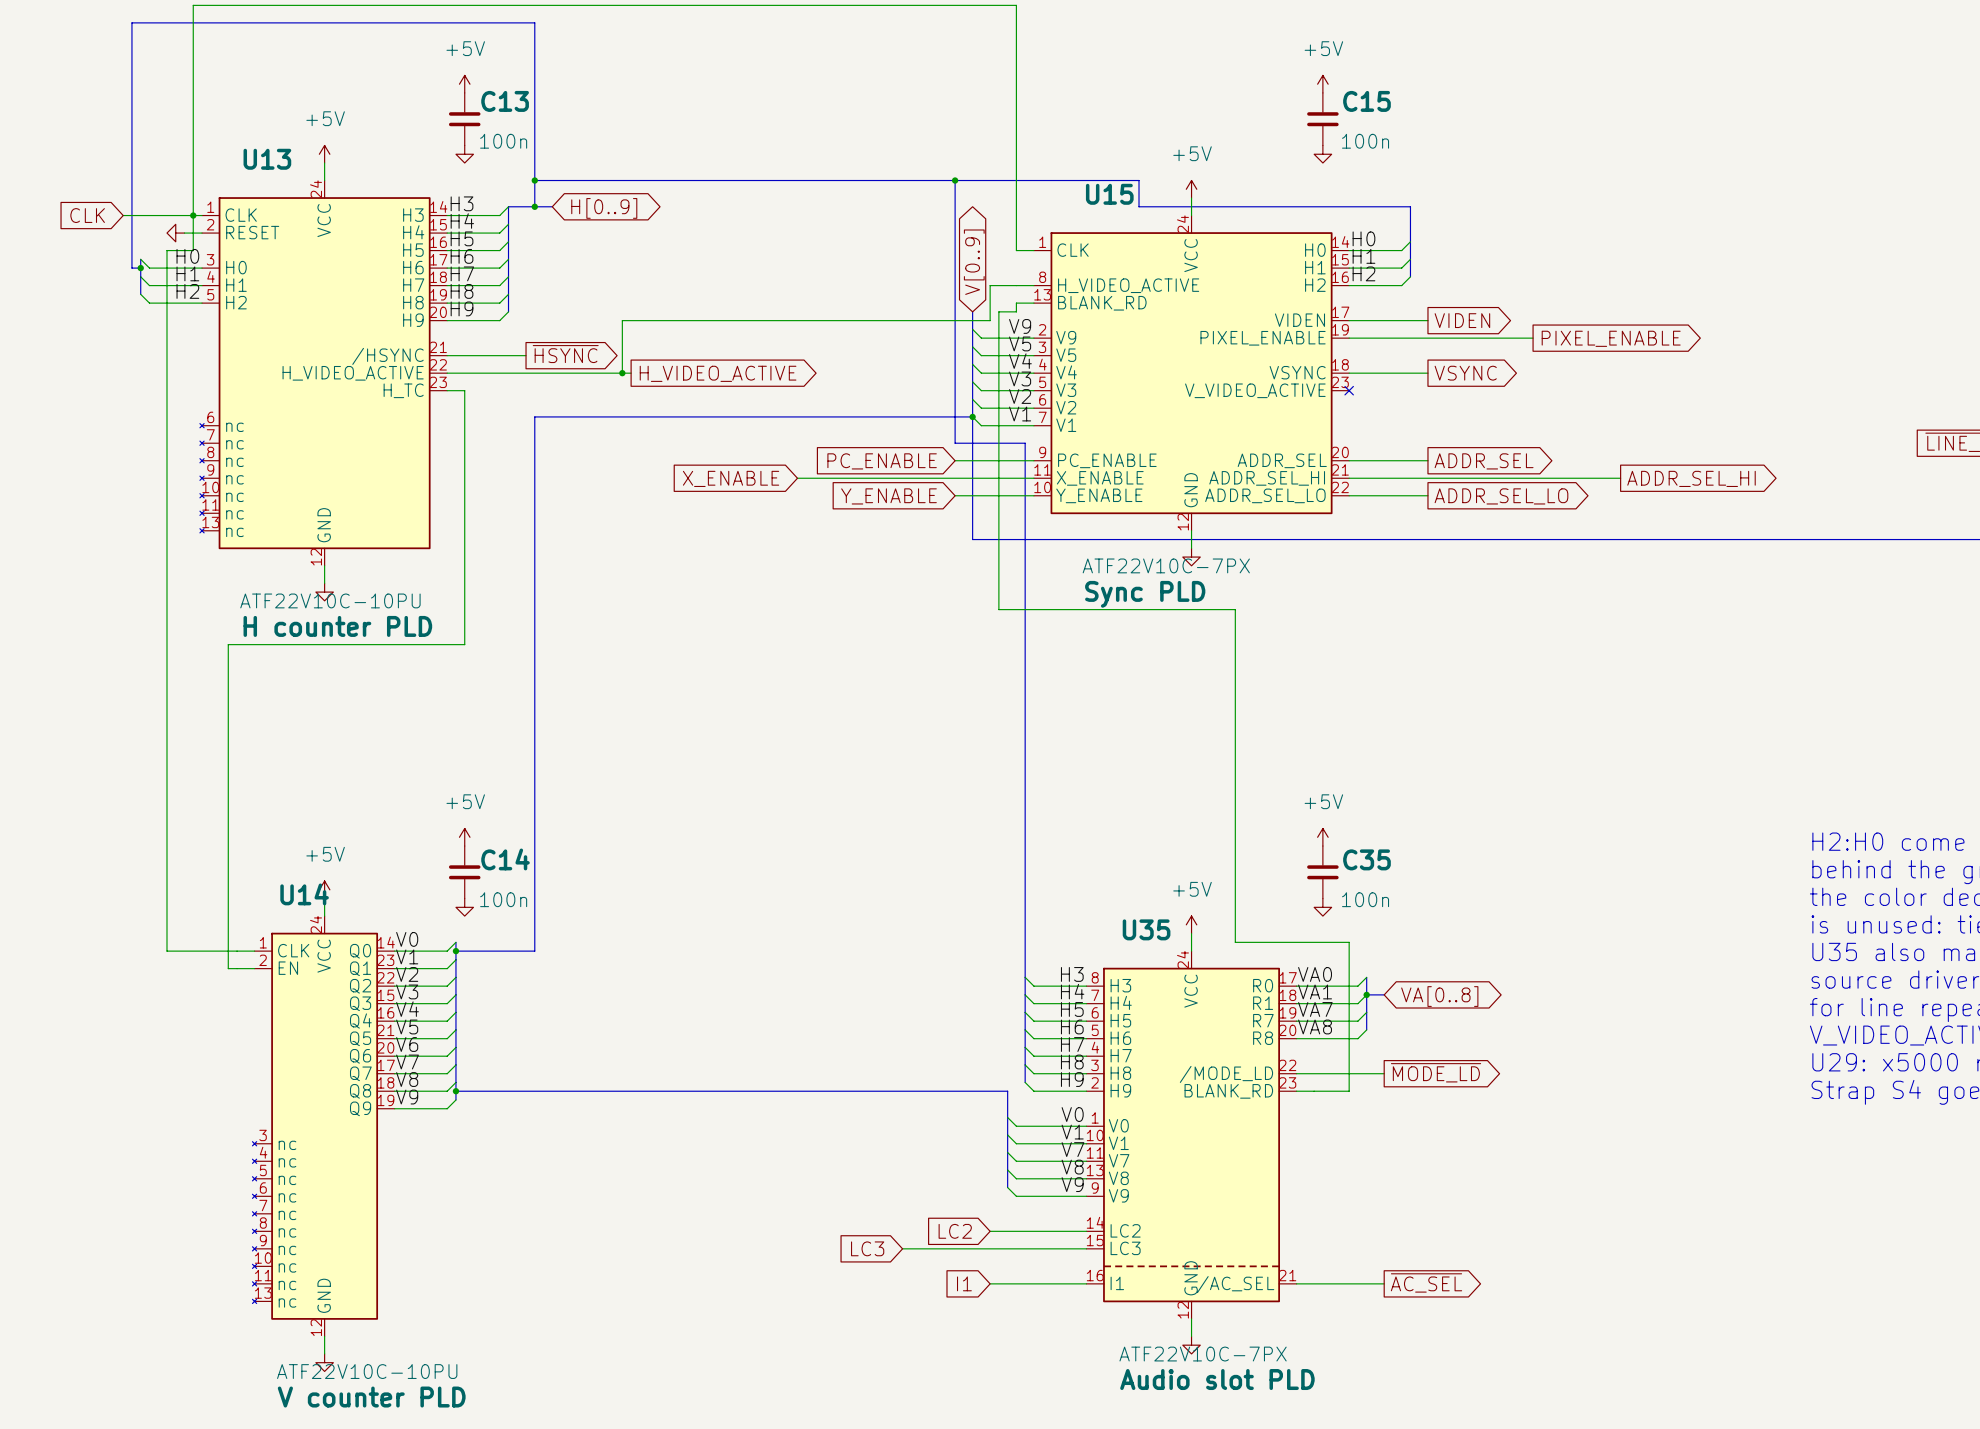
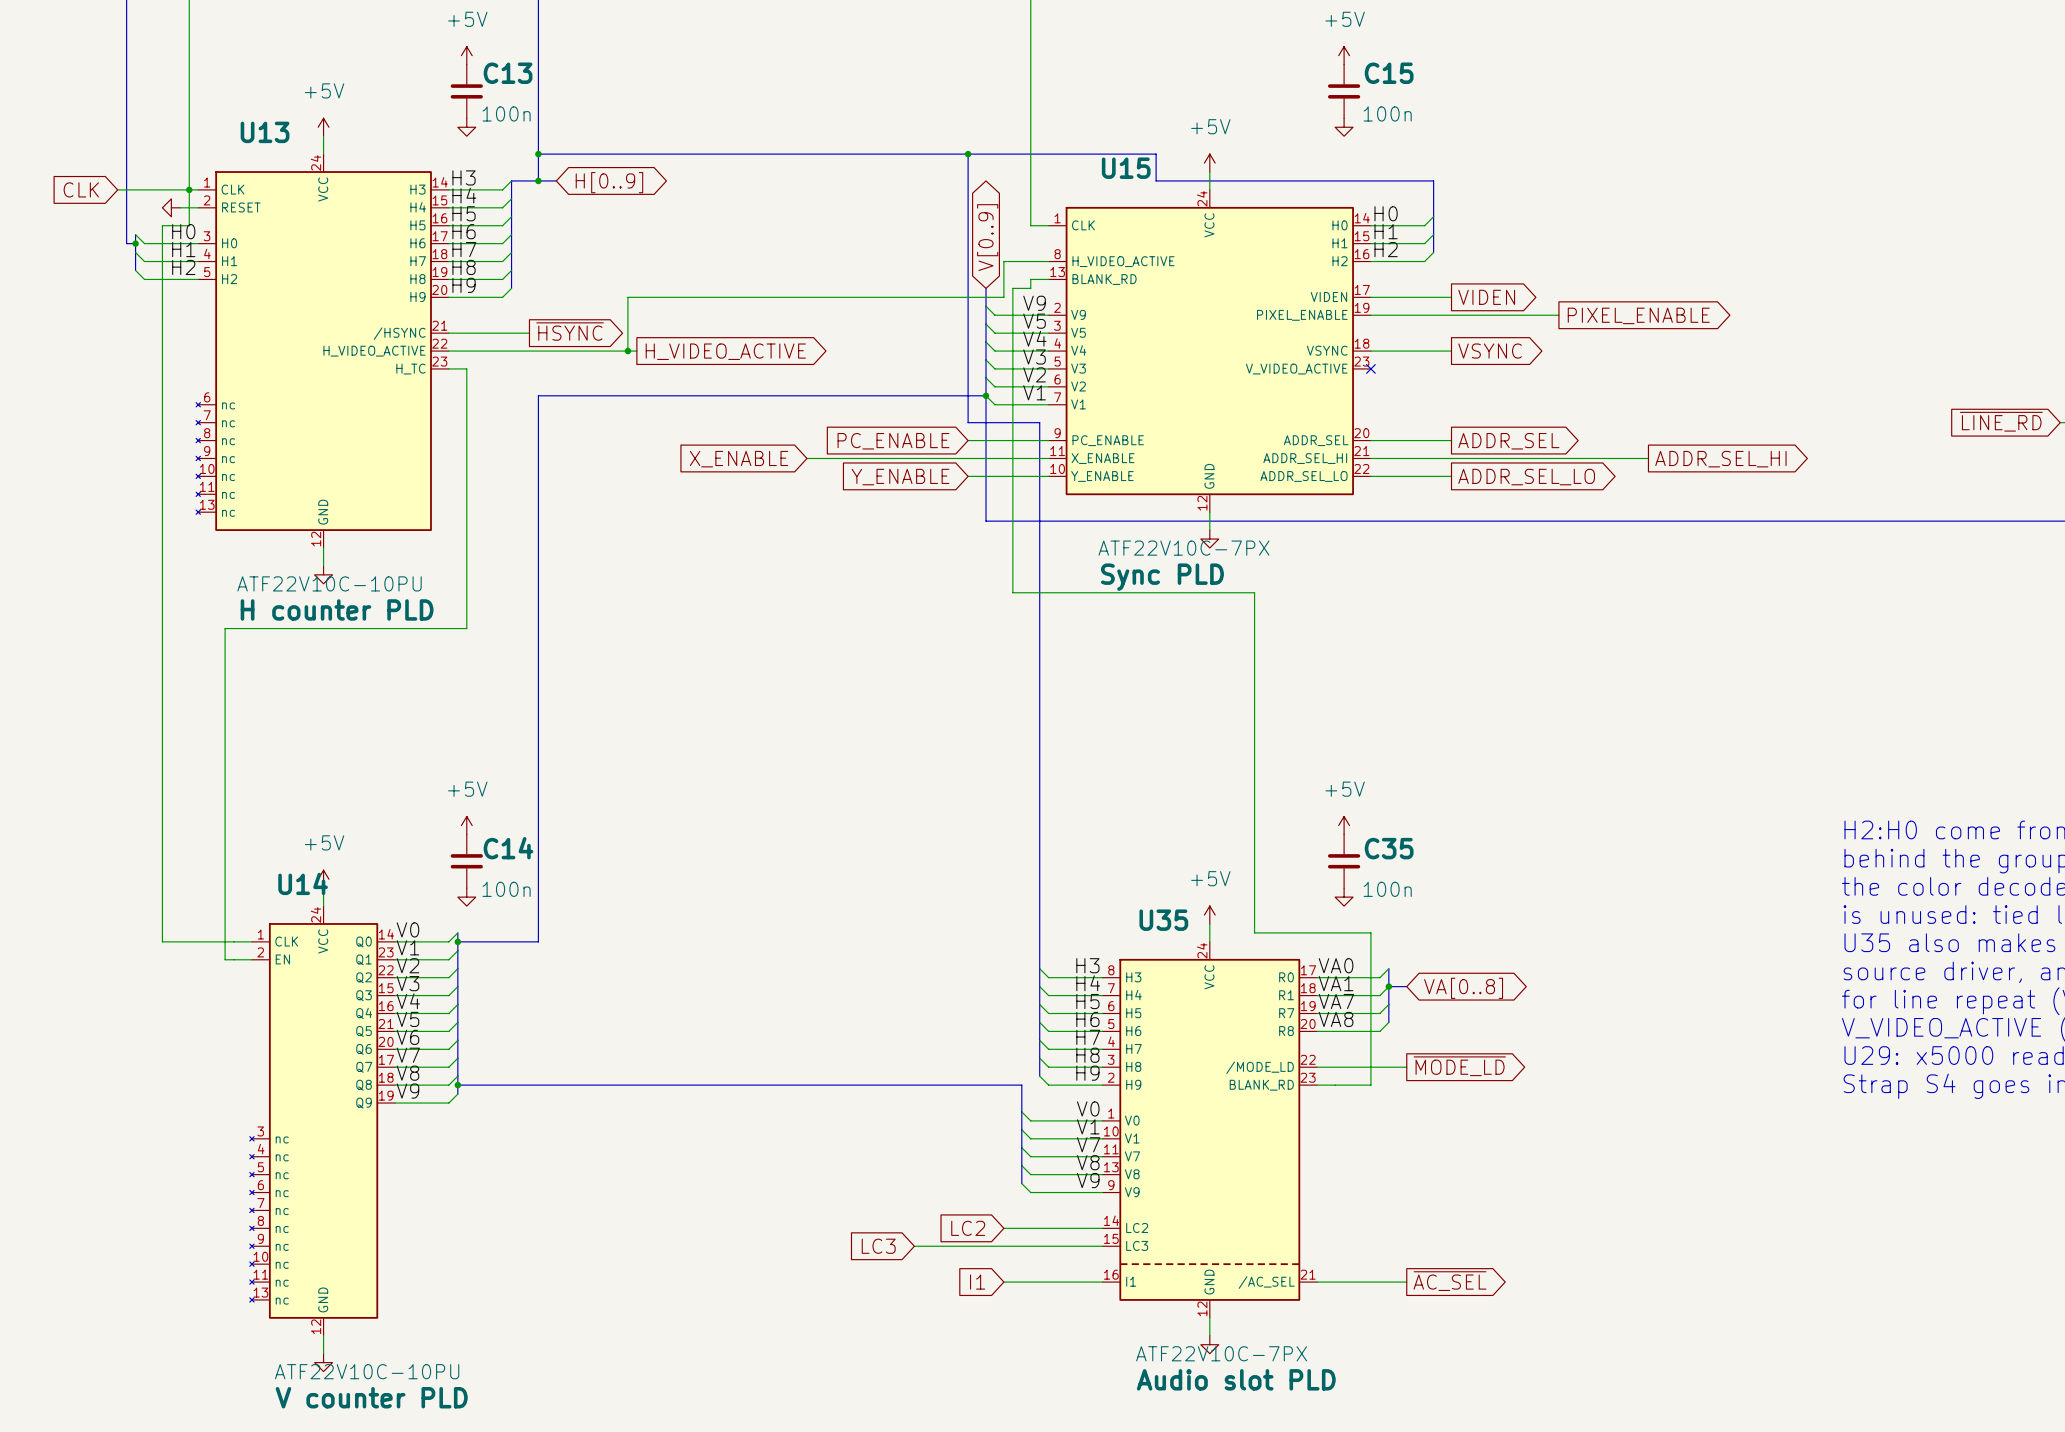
U13 symbol: [199, 180, 448, 566] -> [196, 154, 449, 548]
U15 symbol: [1033, 215, 1350, 531] -> [1048, 189, 1371, 513]
U14 symbol: [252, 916, 395, 1337] -> [249, 906, 396, 1336]
U35 symbol: [1086, 951, 1297, 1319] -> [1102, 941, 1318, 1318]

